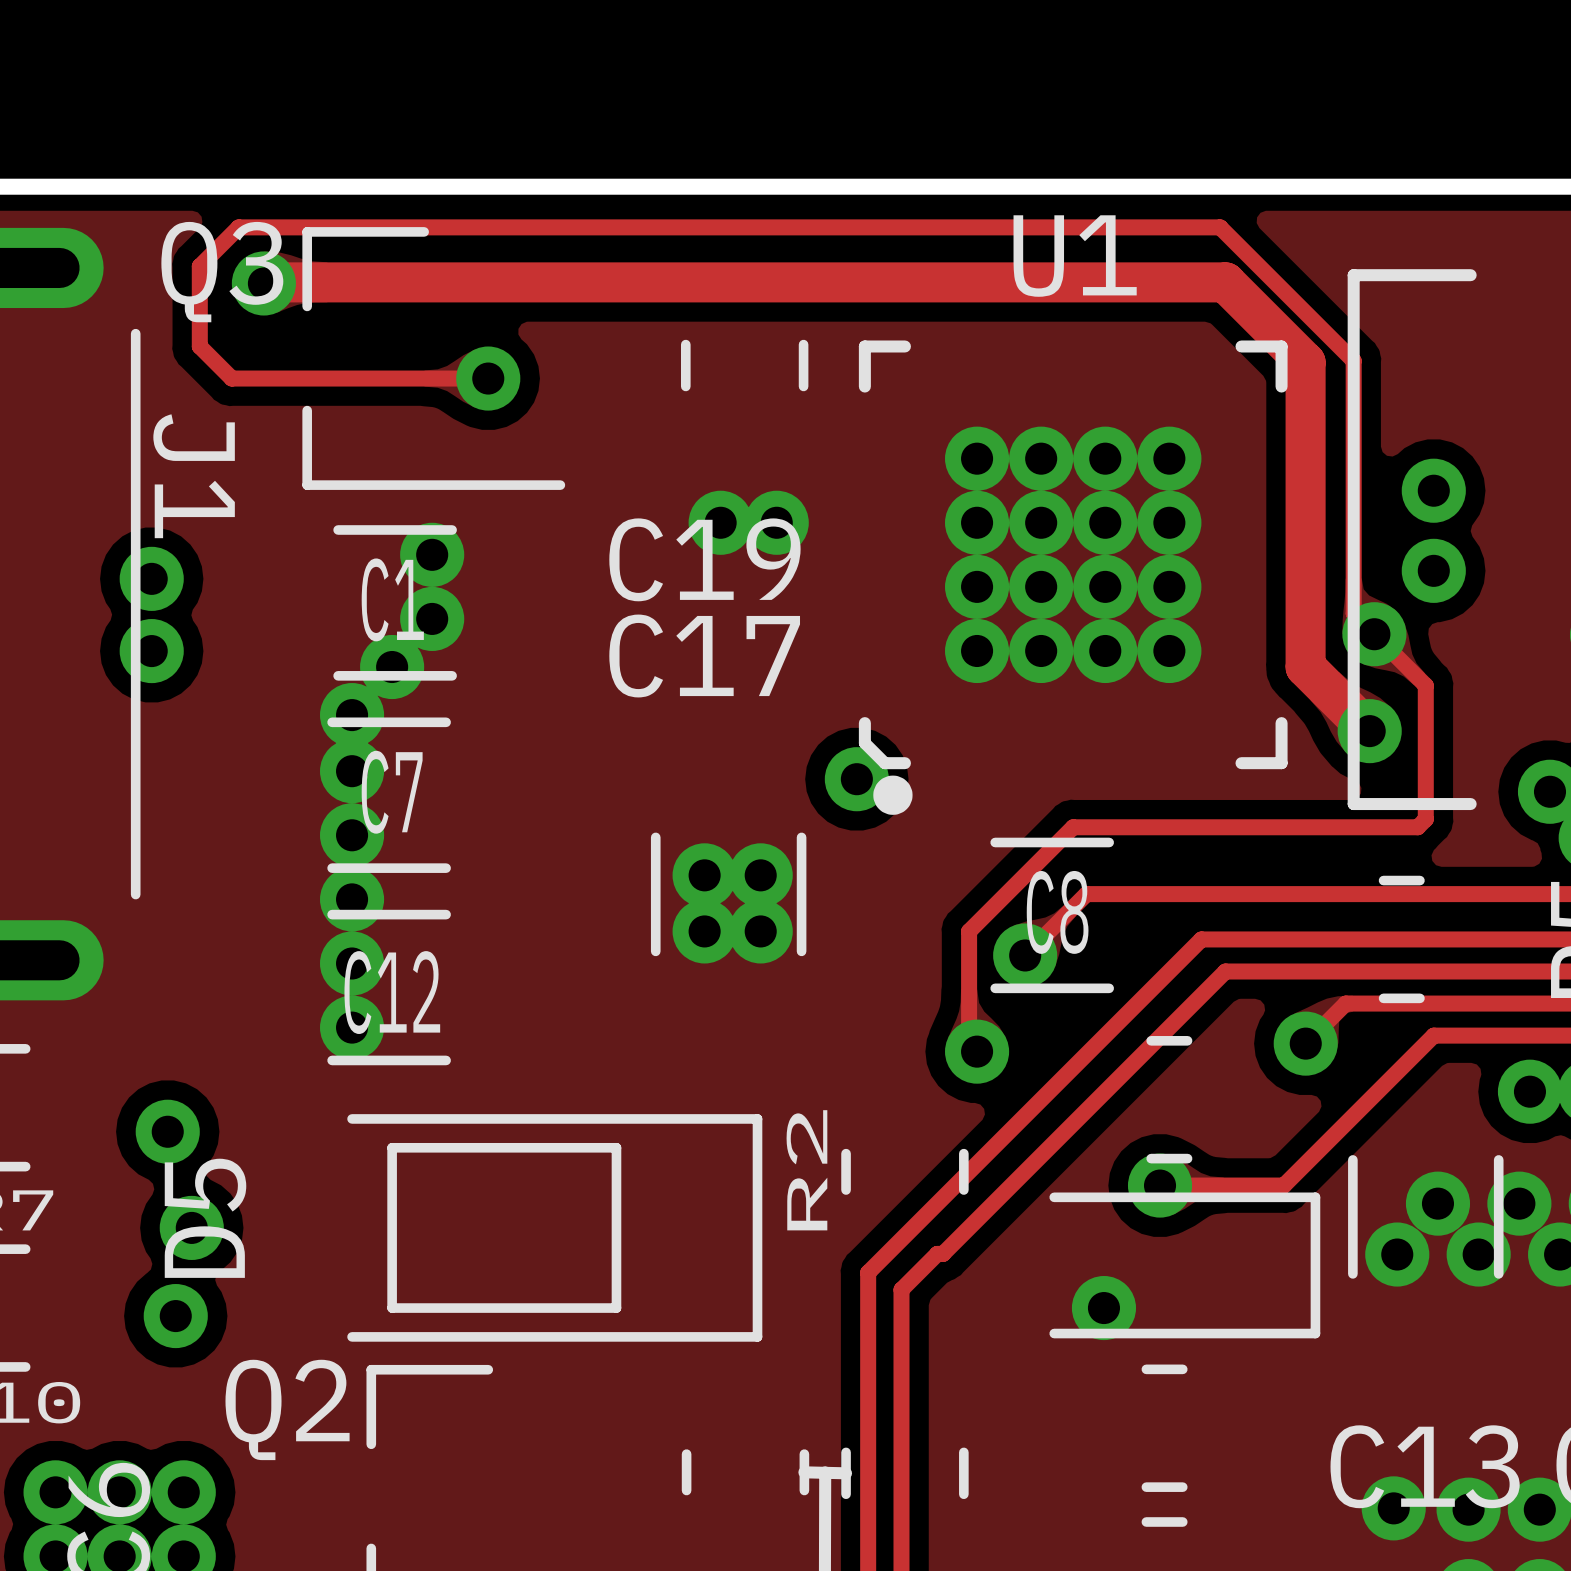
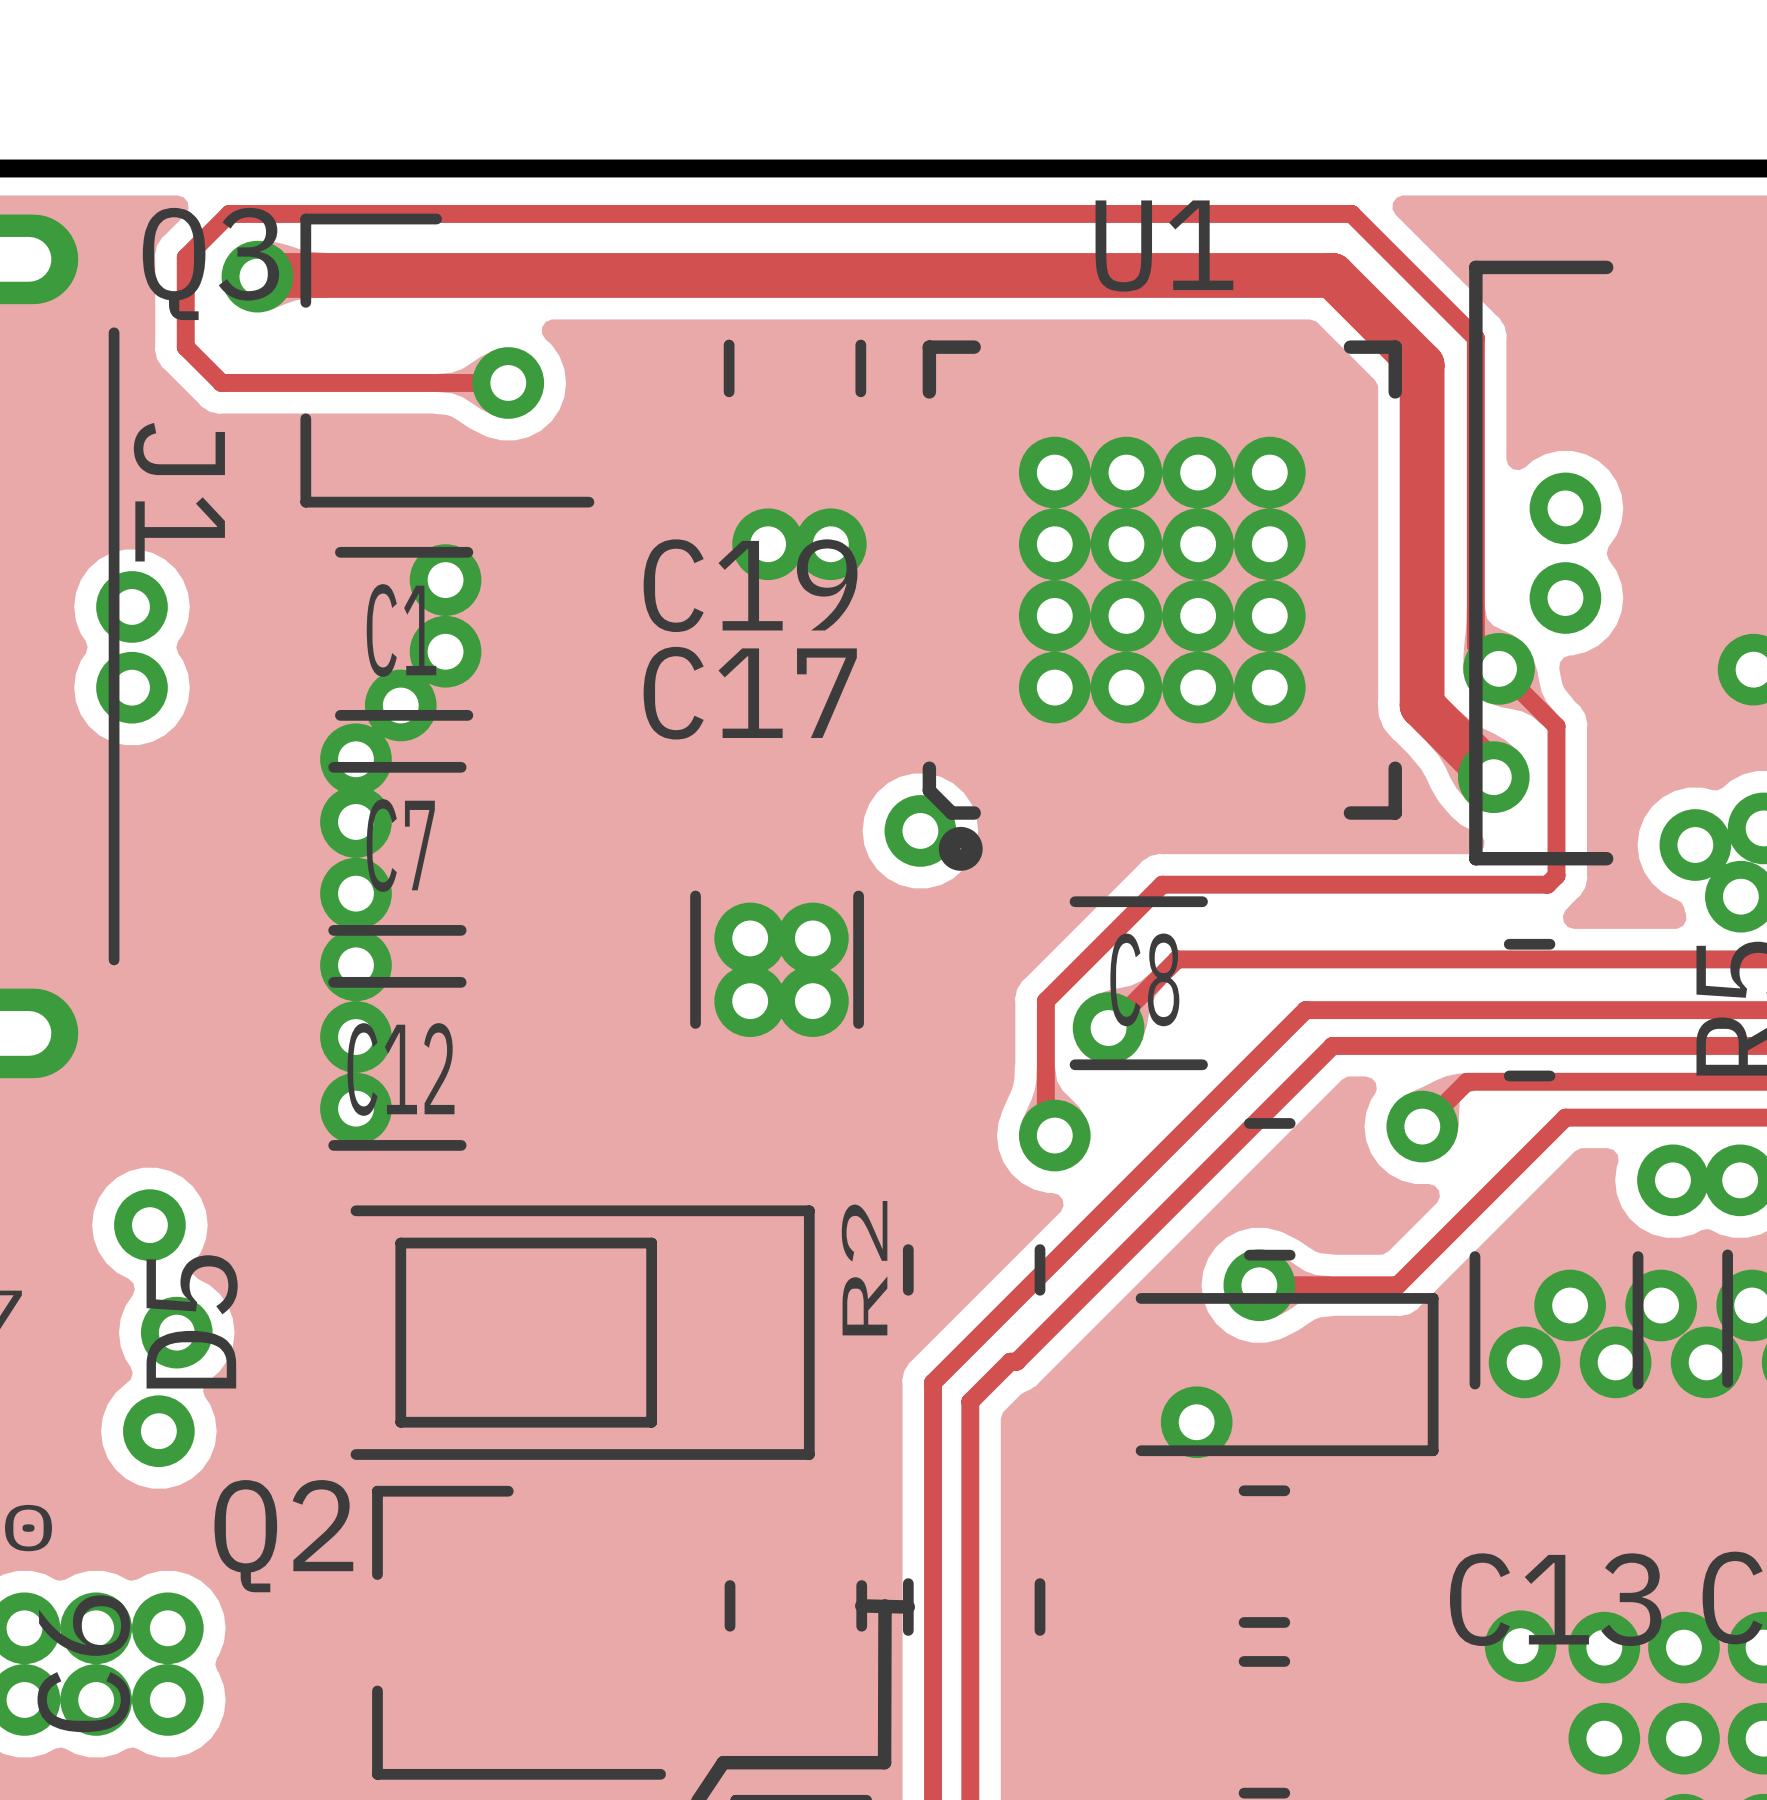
track: (1220, 227) (1353, 360) -> (1326, 213) (1351, 213) (1475, 338) (1475, 363)

